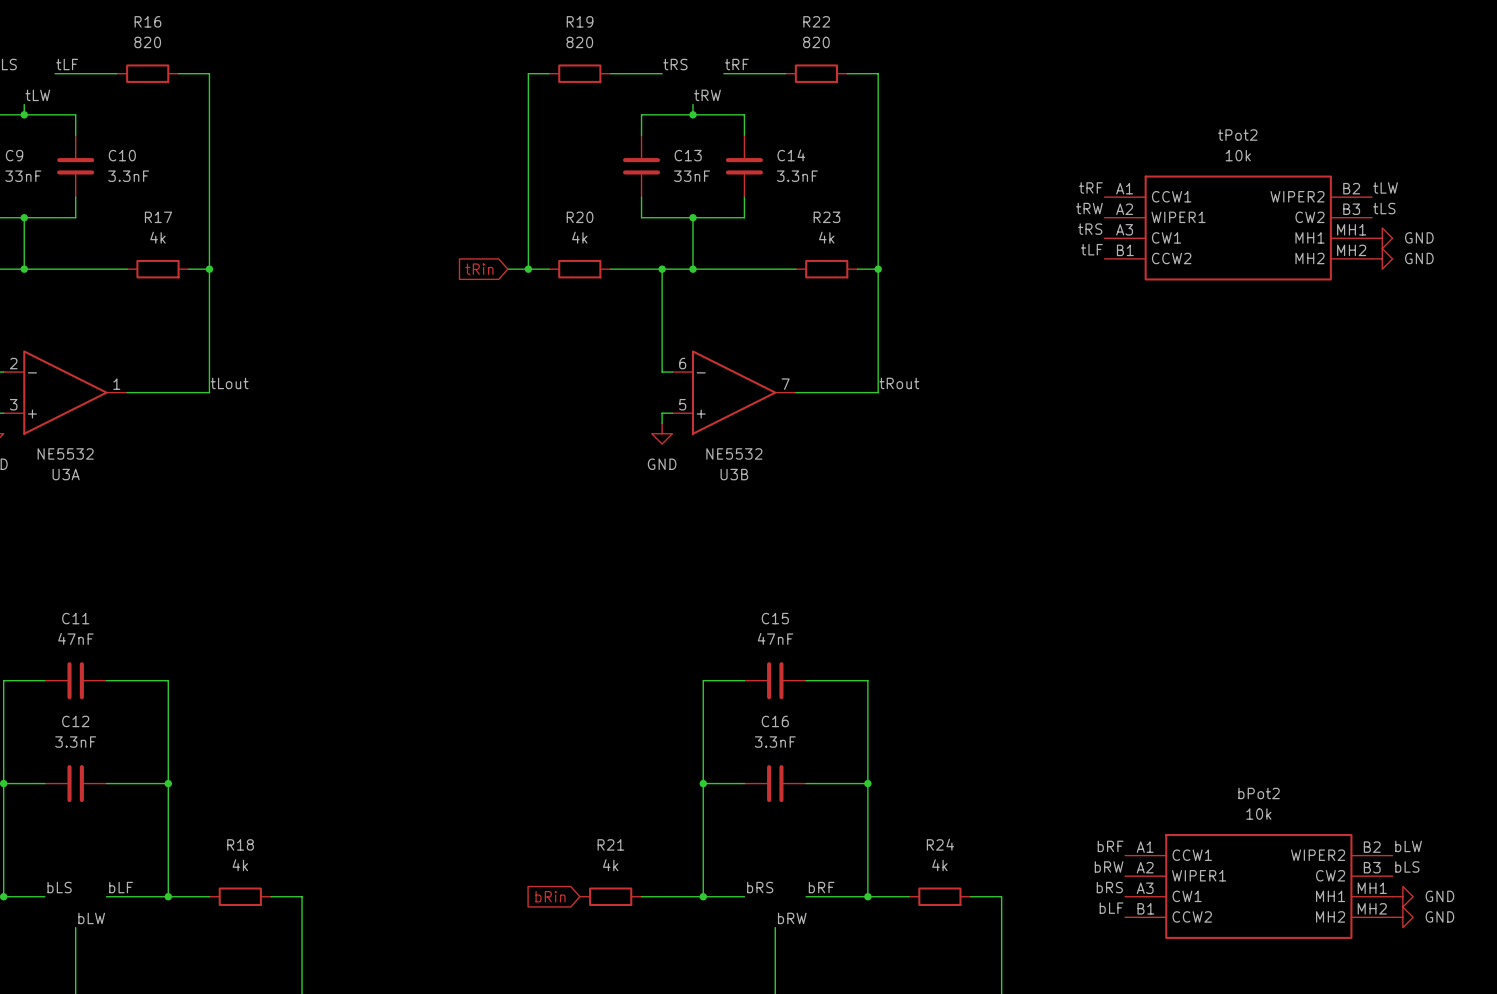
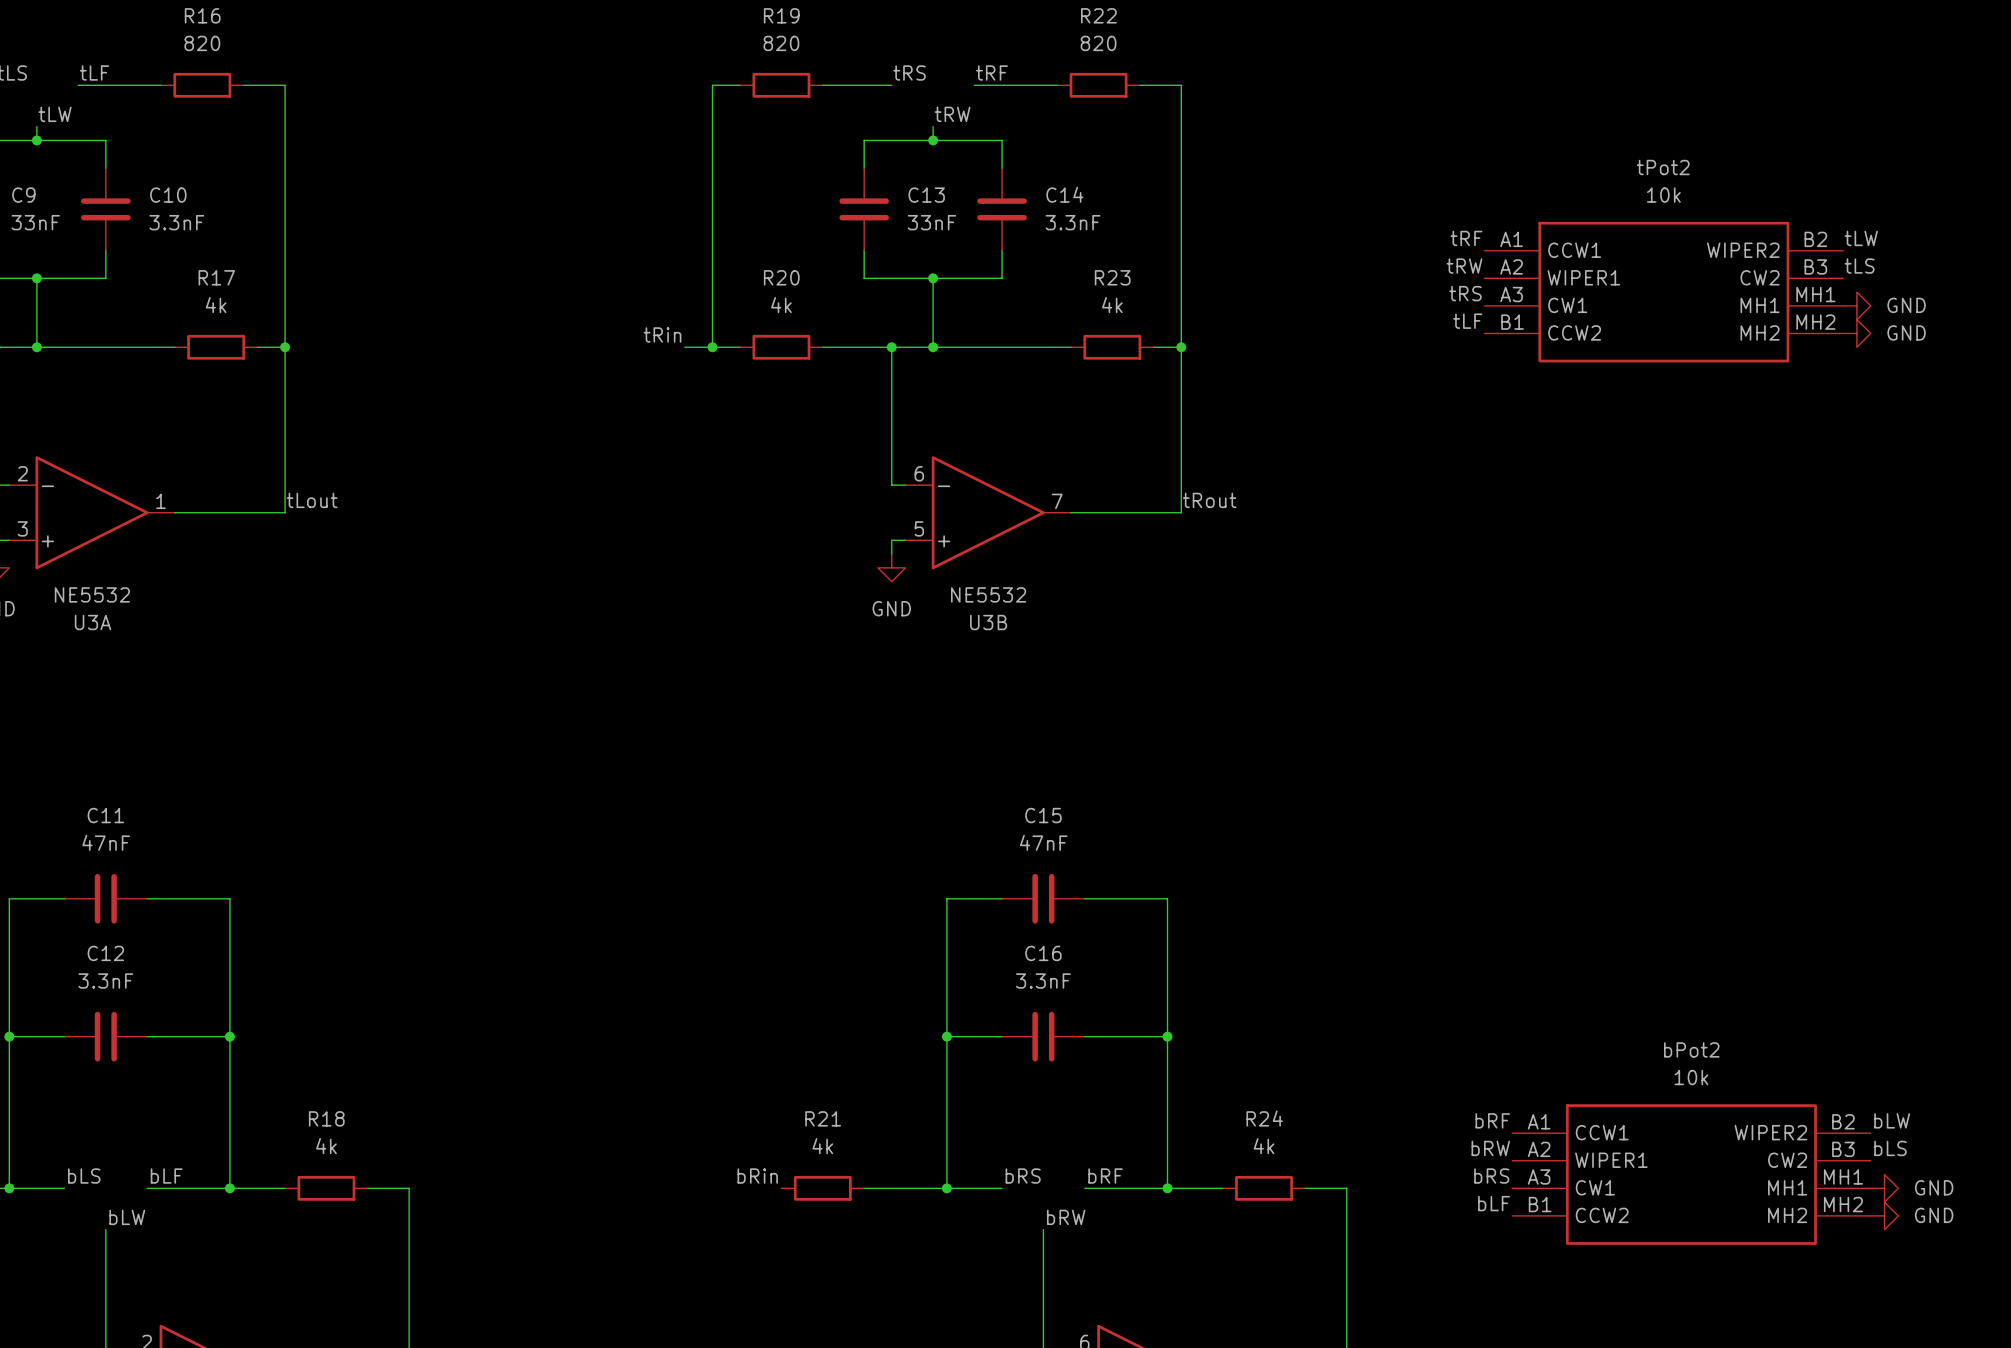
label: none -> tRin (662, 334)
global label: tRin (479, 269) -> none
label: none -> bRin (757, 1176)
global label: bRin (550, 896) -> none

